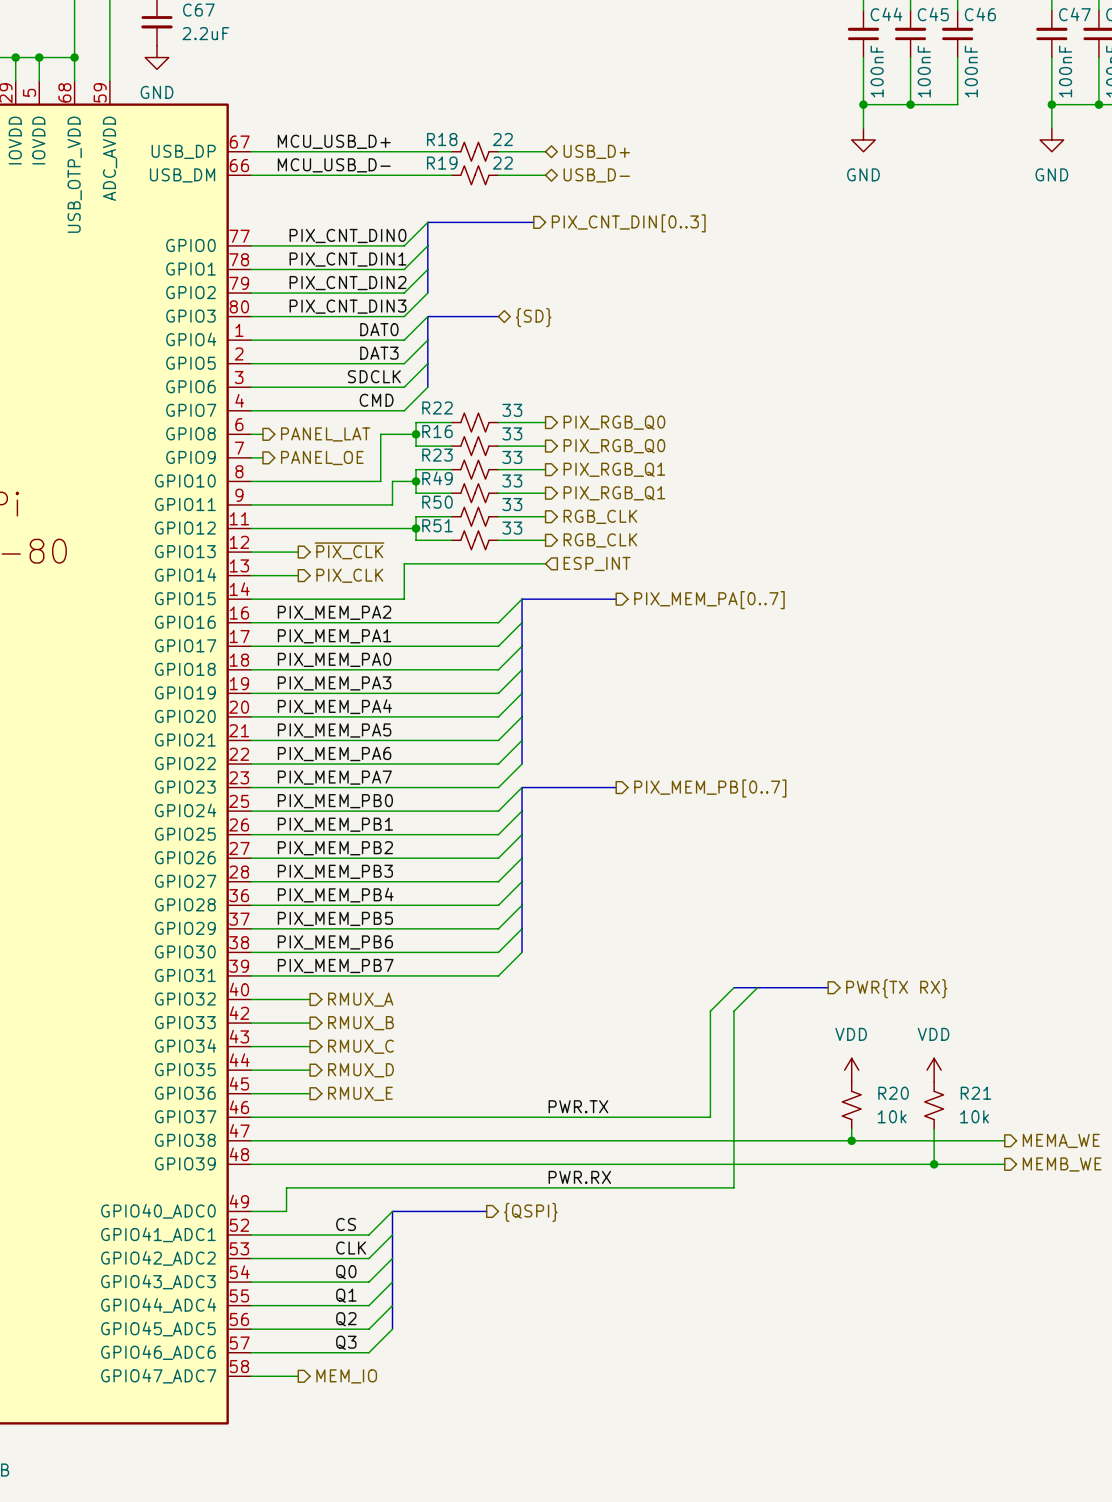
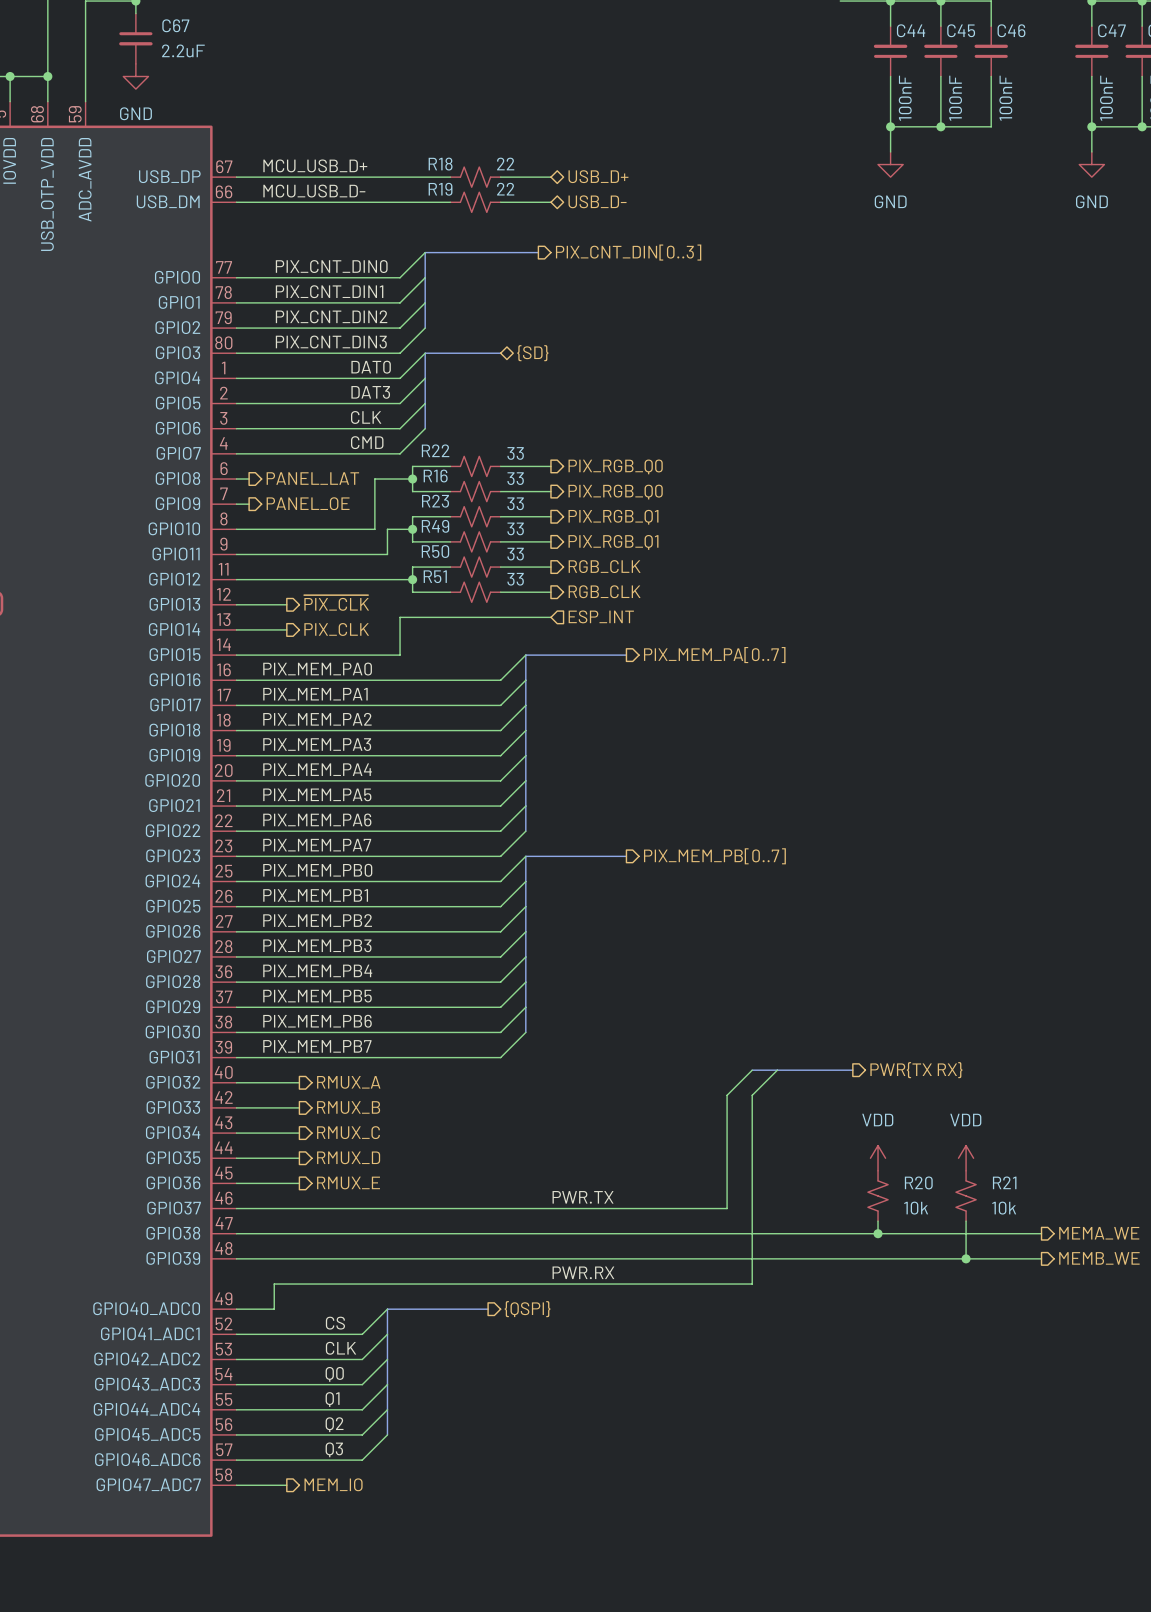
label: SDCLK (374, 376) -> CLK (366, 417)
label: PIX_MEM_PA2 (334, 612) -> PIX_MEM_PA0 (317, 669)
label: PIX_MEM_PA0 (334, 659) -> PIX_MEM_PA2 (317, 719)

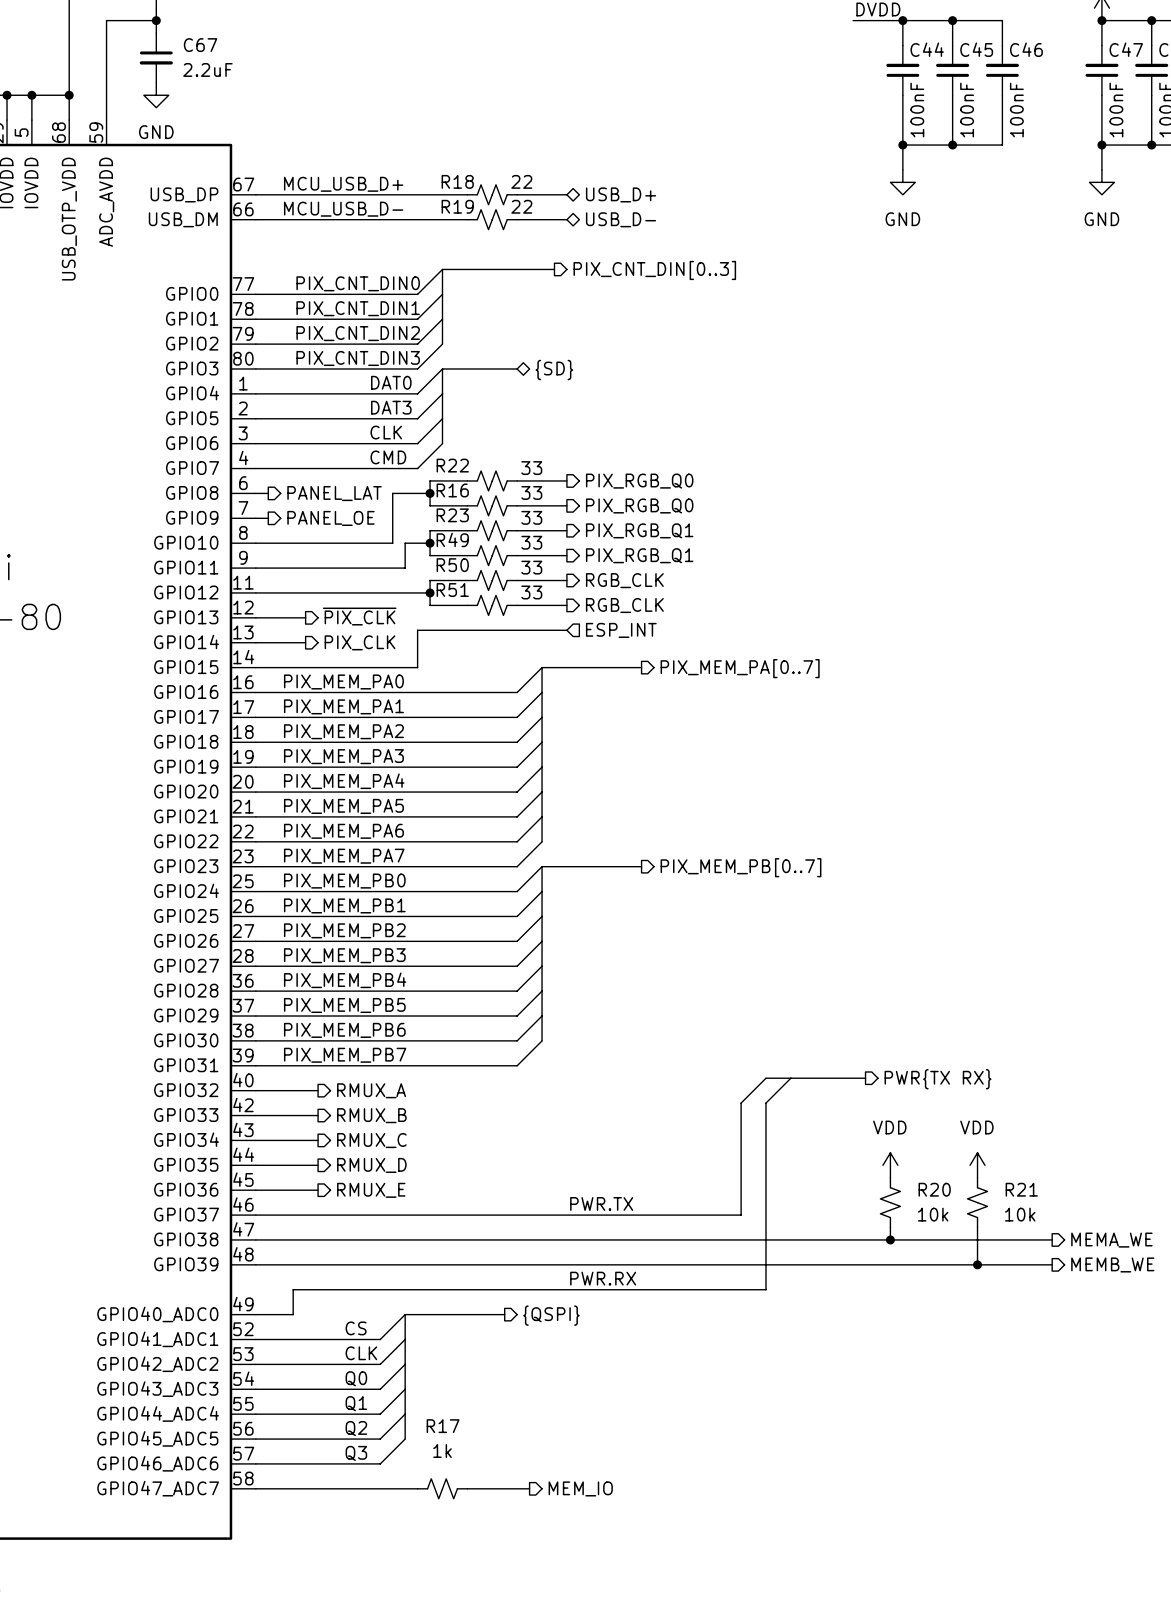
hierarchical label position: MEM_IO (333, 1484) -> MEM_IO (580, 1488)
wire: none -> (305, 1488) (417, 1488)
R17: none -> 1k (442, 1488)
wire: none -> (467, 1488) (529, 1488)

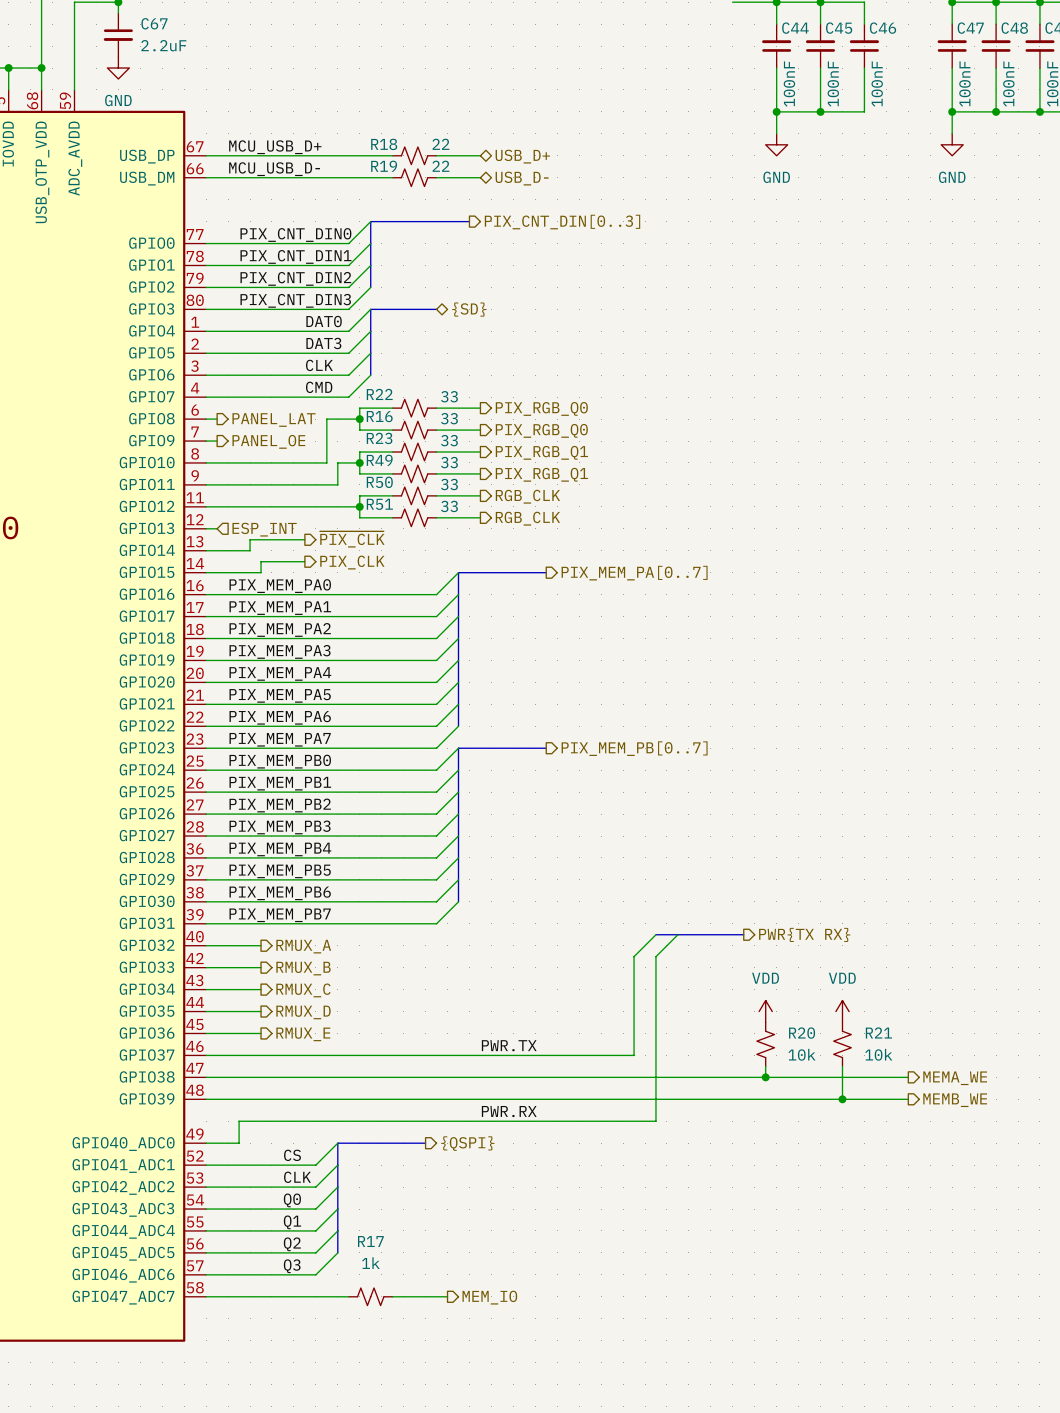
hierarchical label position: ~{PIX_CLK} (359, 616) -> ~{PIX_CLK} (352, 539)
wire: (268, 617) (305, 617) -> none
hierarchical label: none -> ESP_INT (264, 529)
wire: none -> (304, 539) (250, 539) (250, 550)
wire: (566, 630) (417, 630) (417, 667) (318, 667) -> (304, 561) (261, 561) (261, 572)
hierarchical label: ESP_INT (621, 630) -> none
hierarchical label position: PIX_CLK (360, 642) -> PIX_CLK (352, 562)

